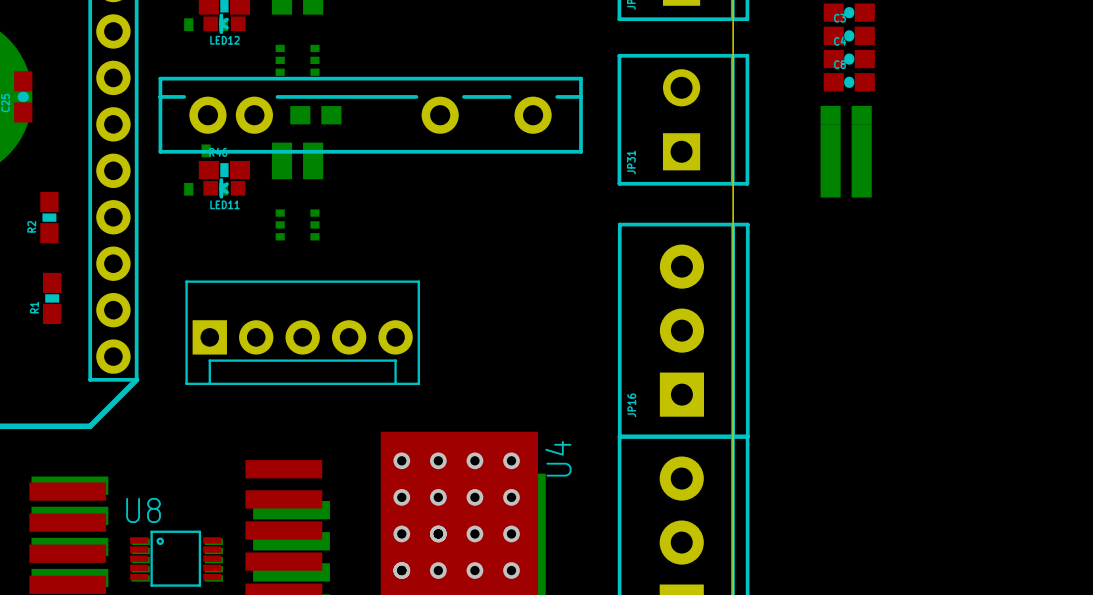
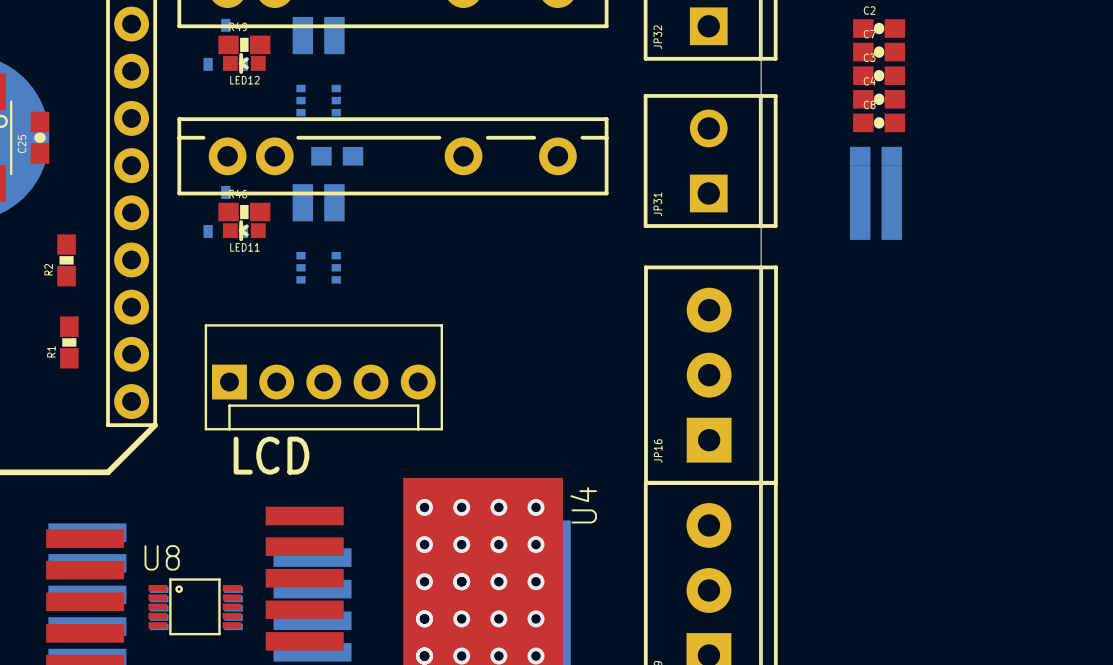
text: none -> LCD (271, 455)

